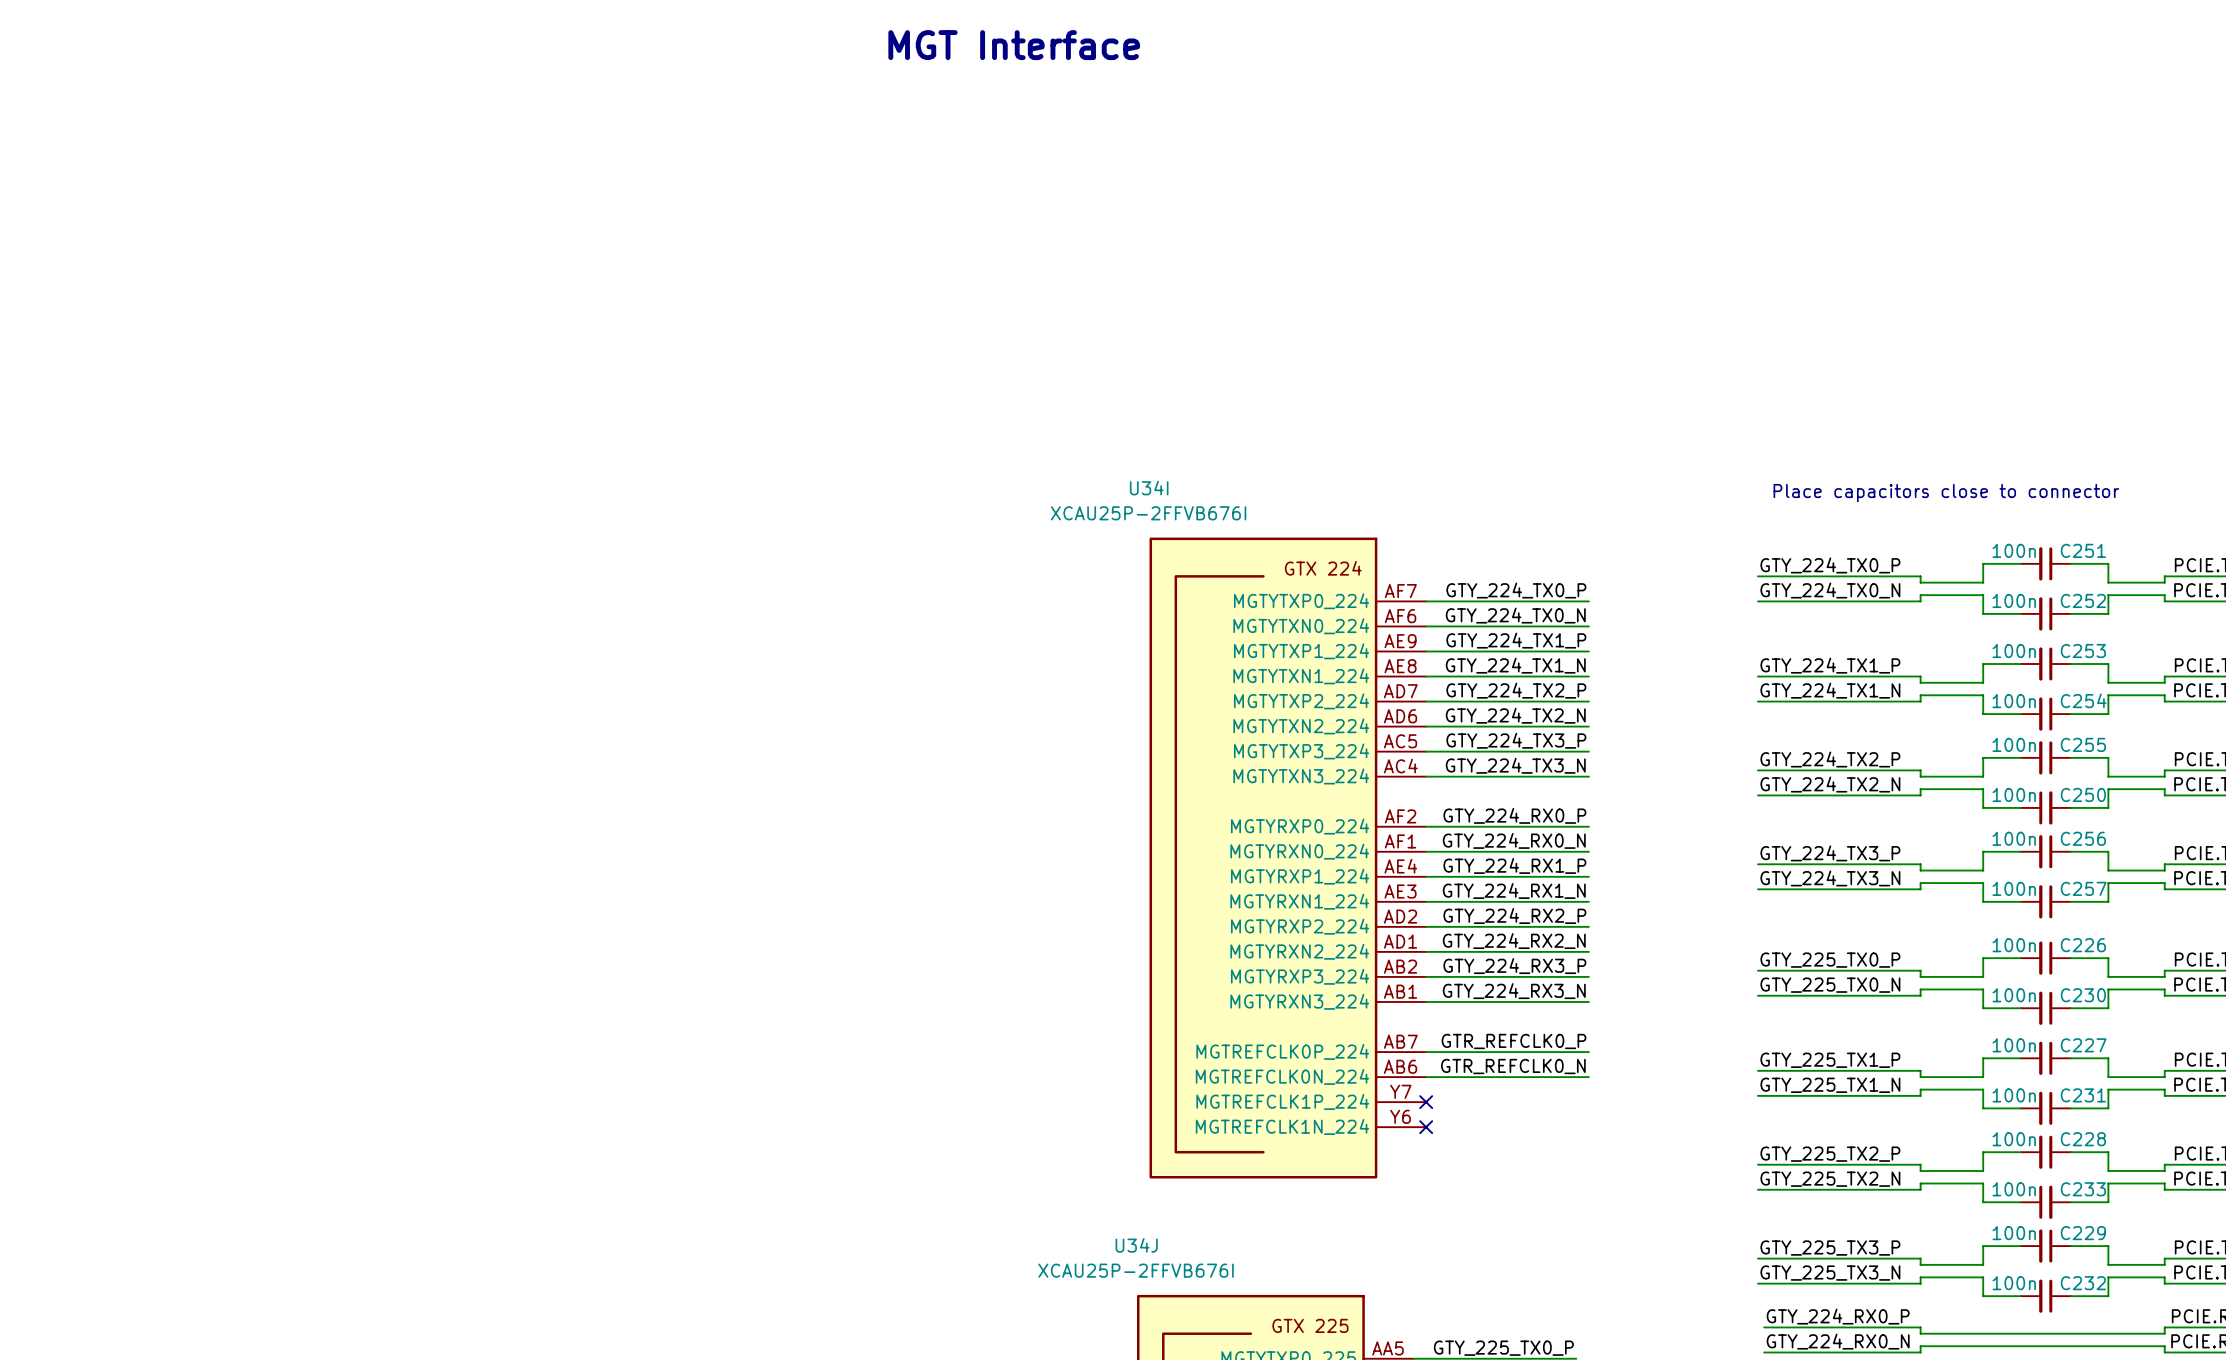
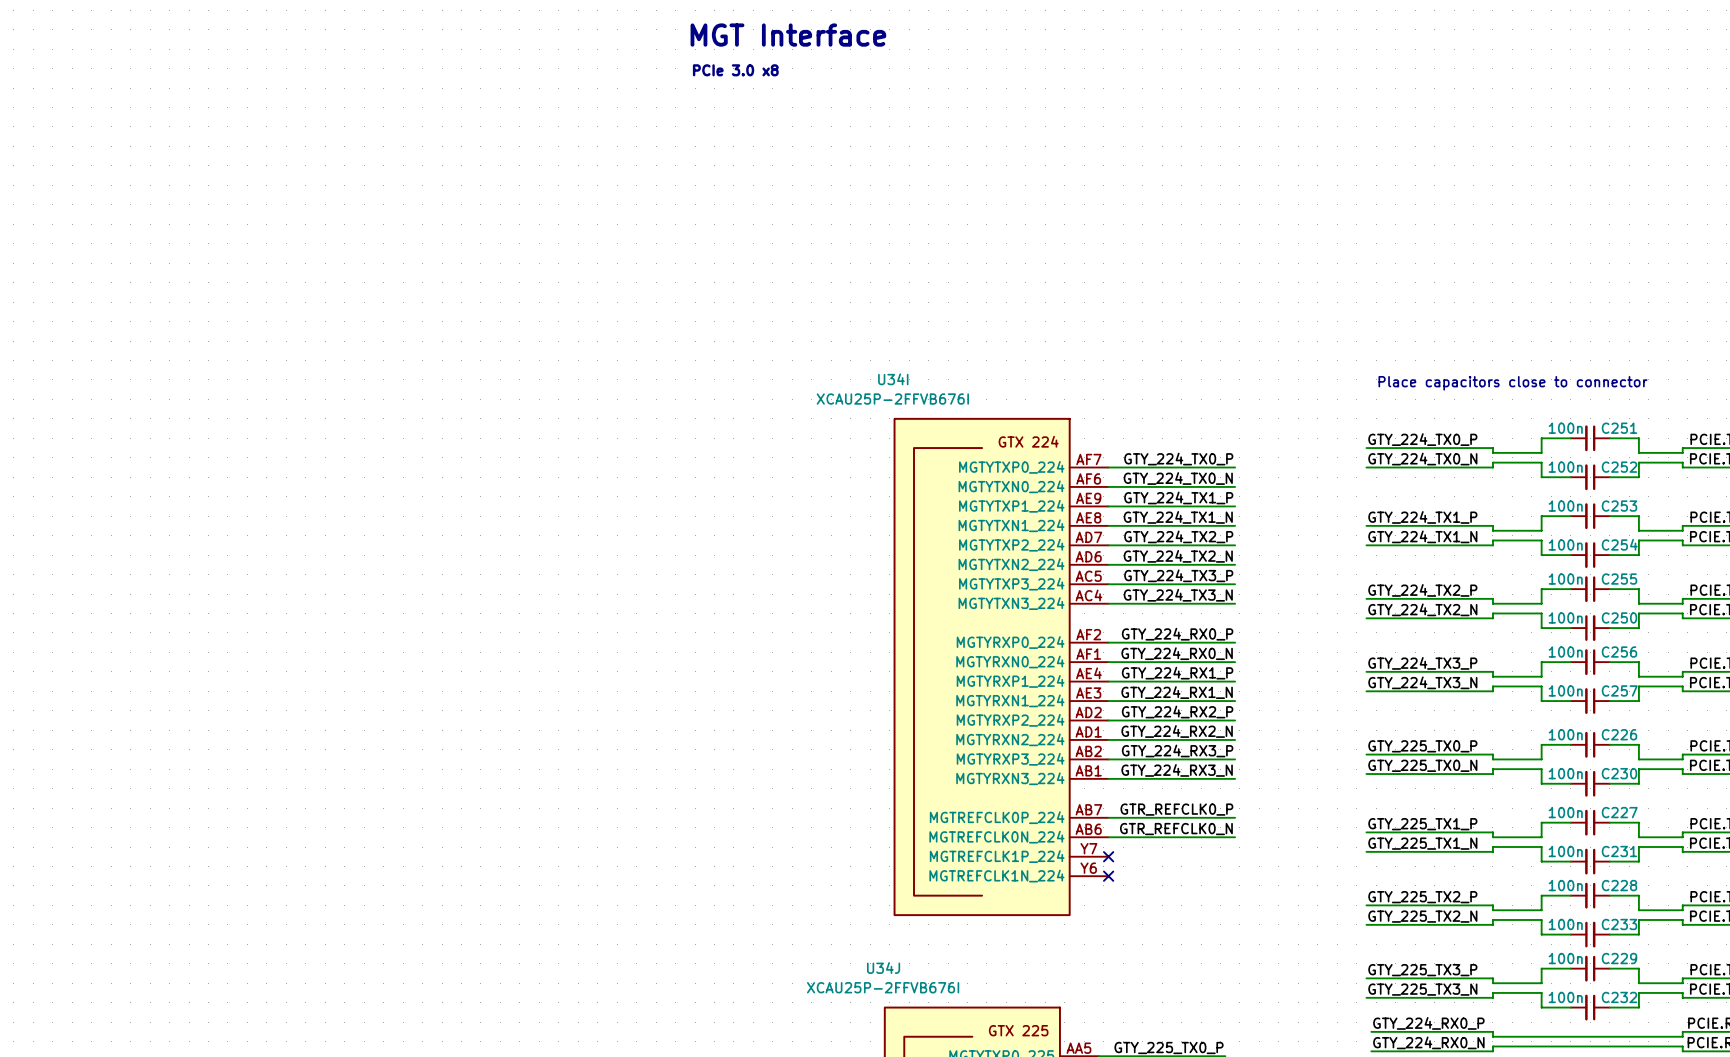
text: none -> PCIe 3.0 x8 (735, 70)

